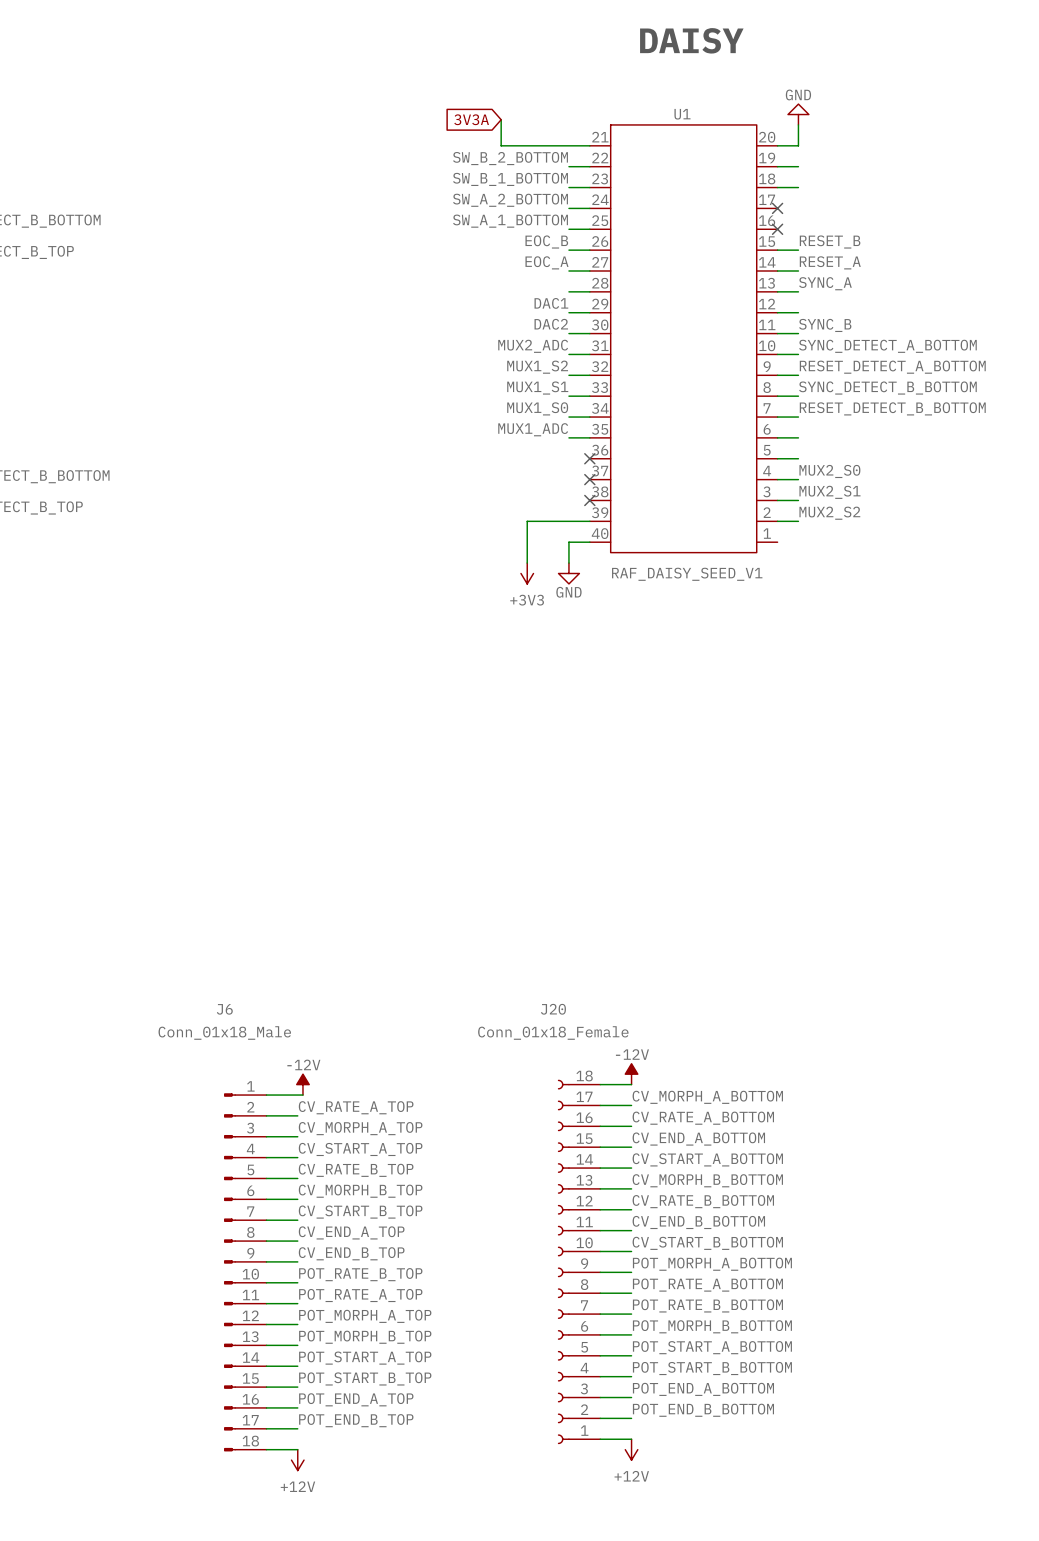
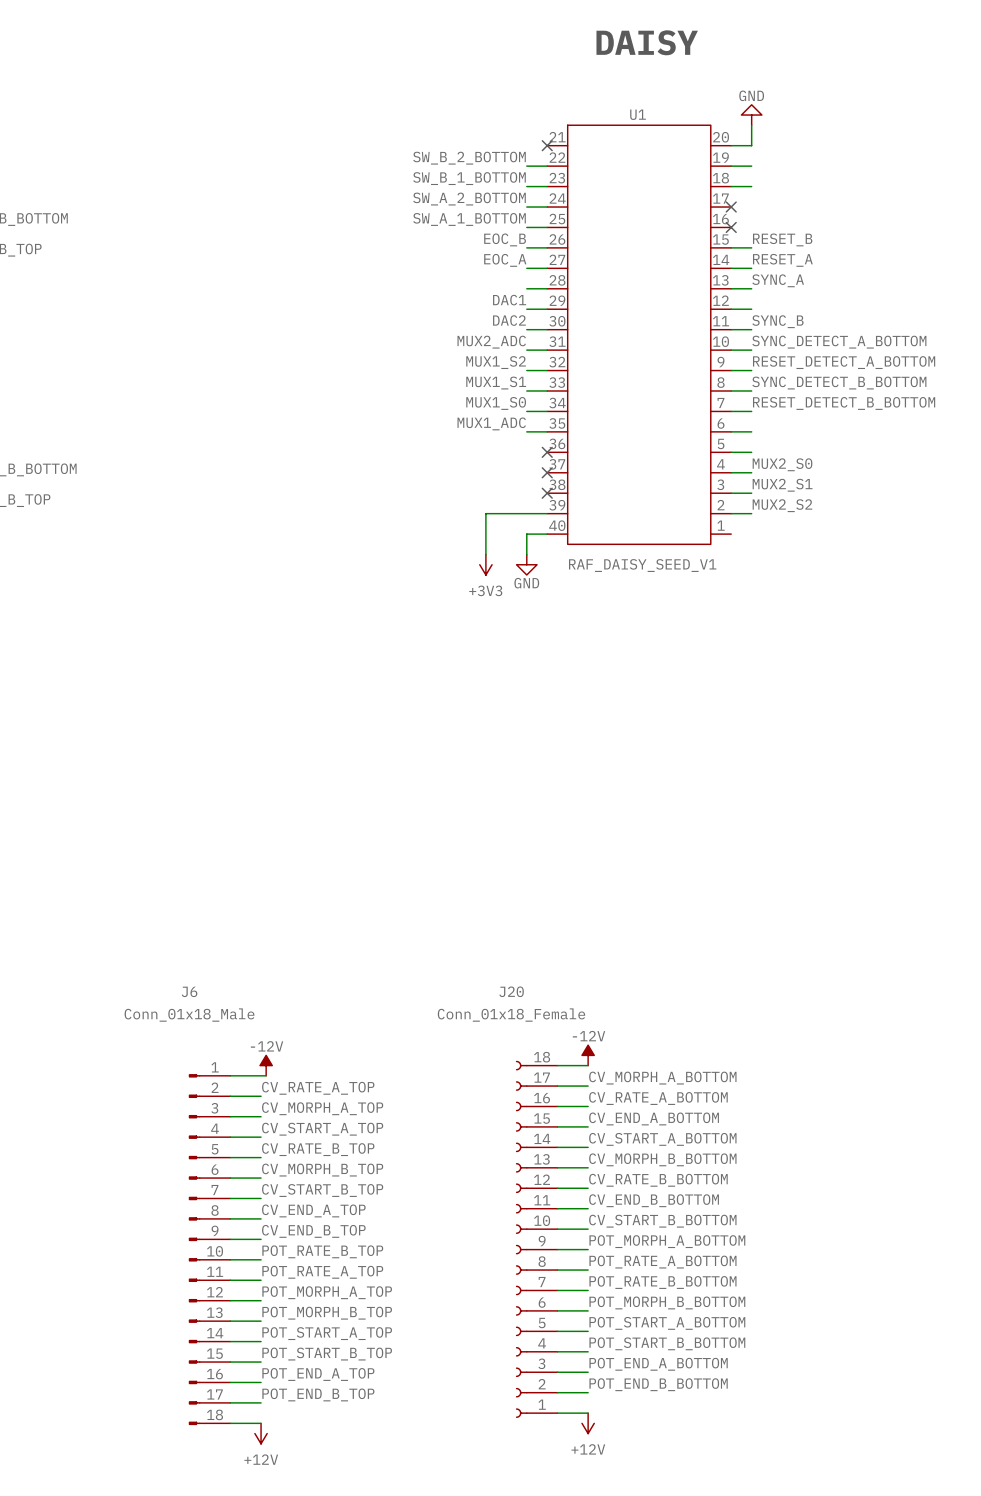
global label: 3V3A (471, 119) -> none
wire: (501, 119) (501, 145) (589, 145) -> none
no-connect mark: none -> (547, 145)

